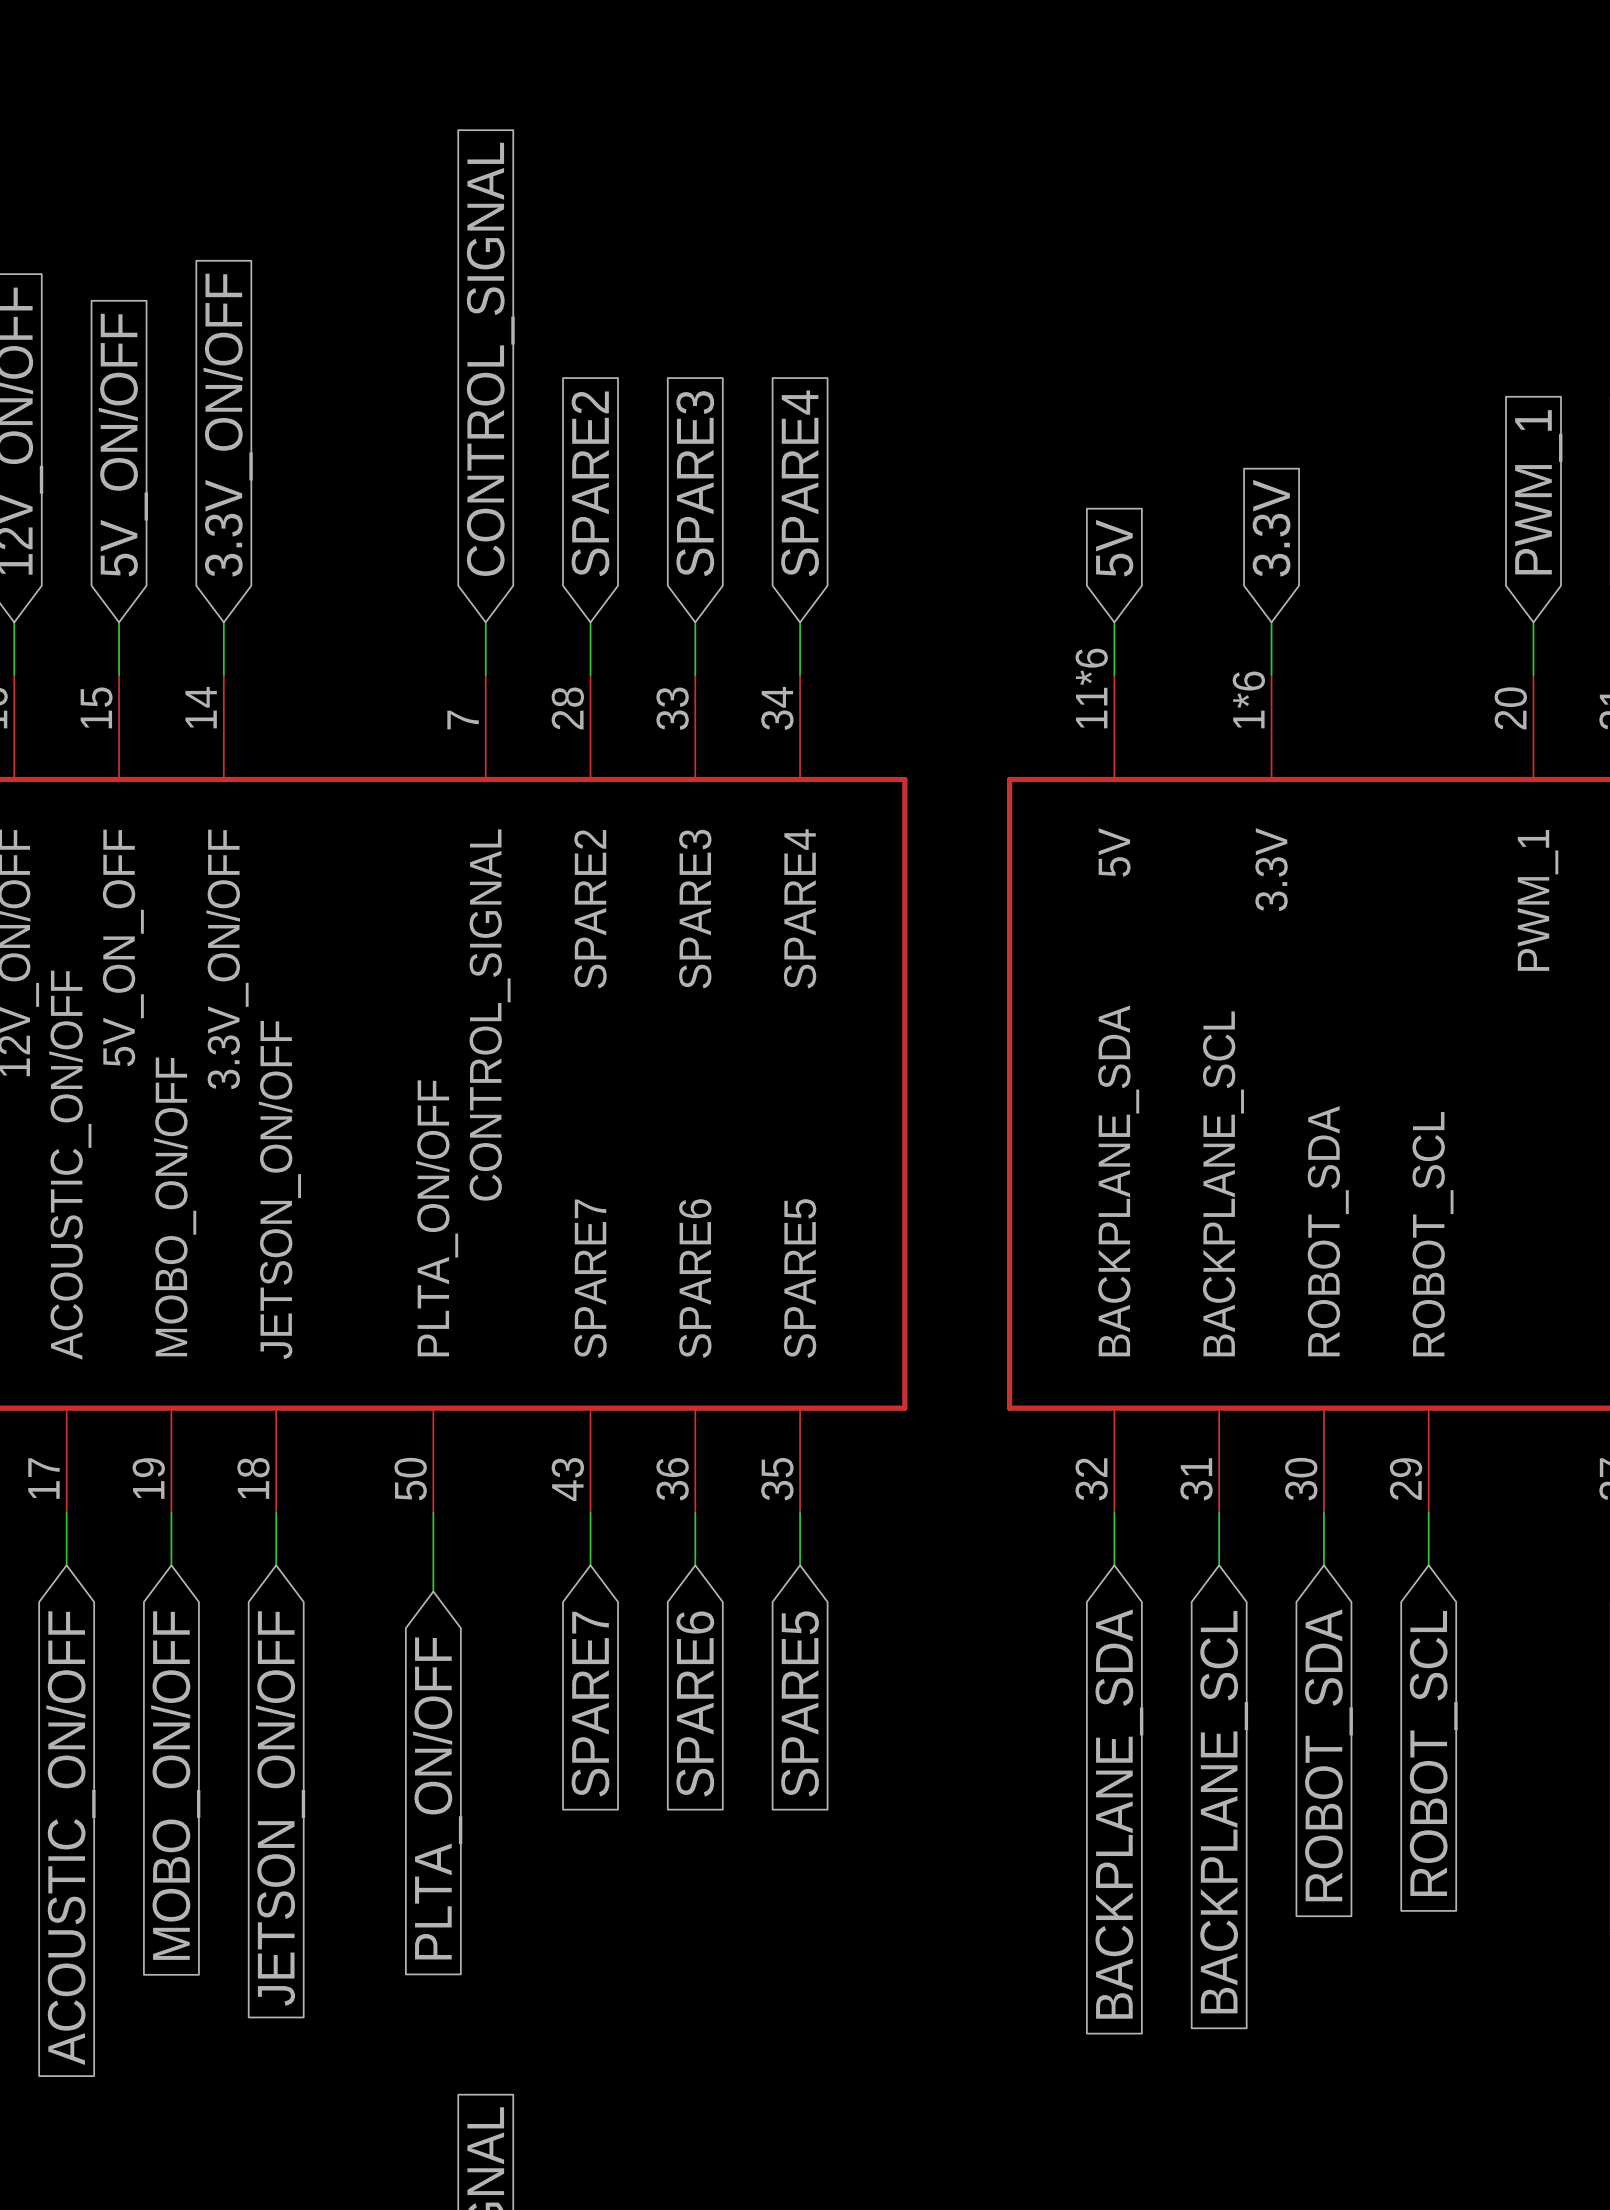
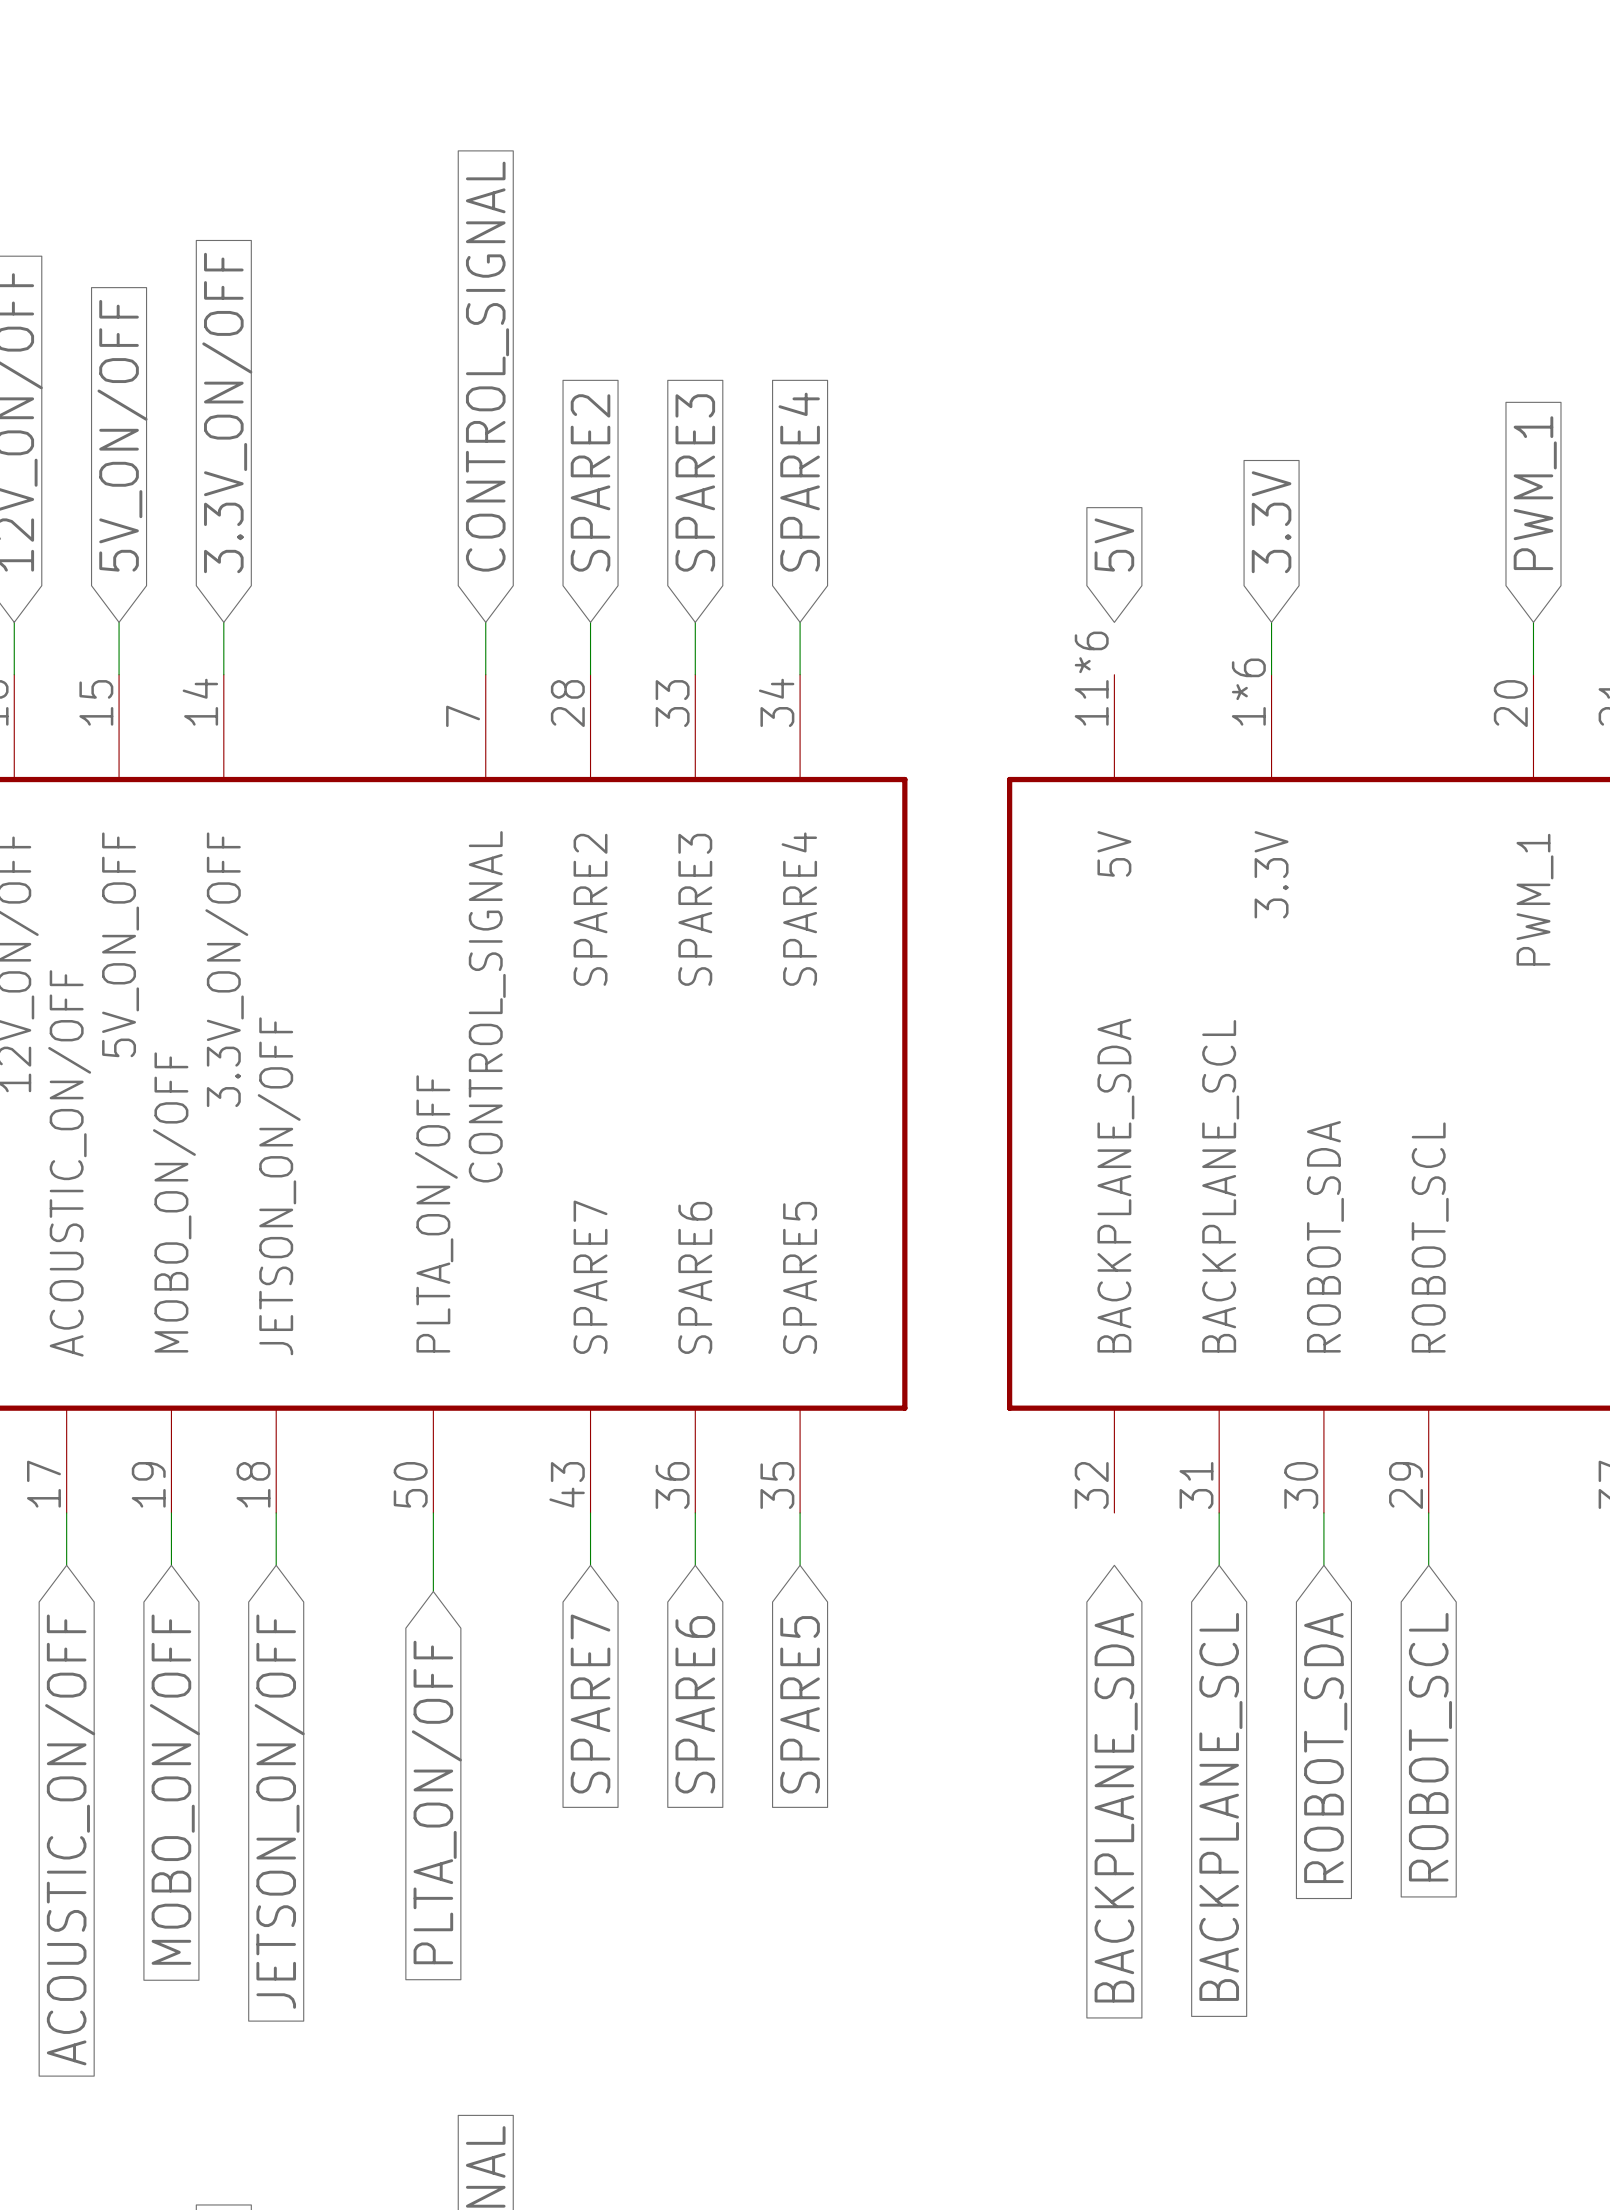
wire: (1114, 622) (1114, 674) -> none
wire: (1114, 1512) (1114, 1565) -> none

